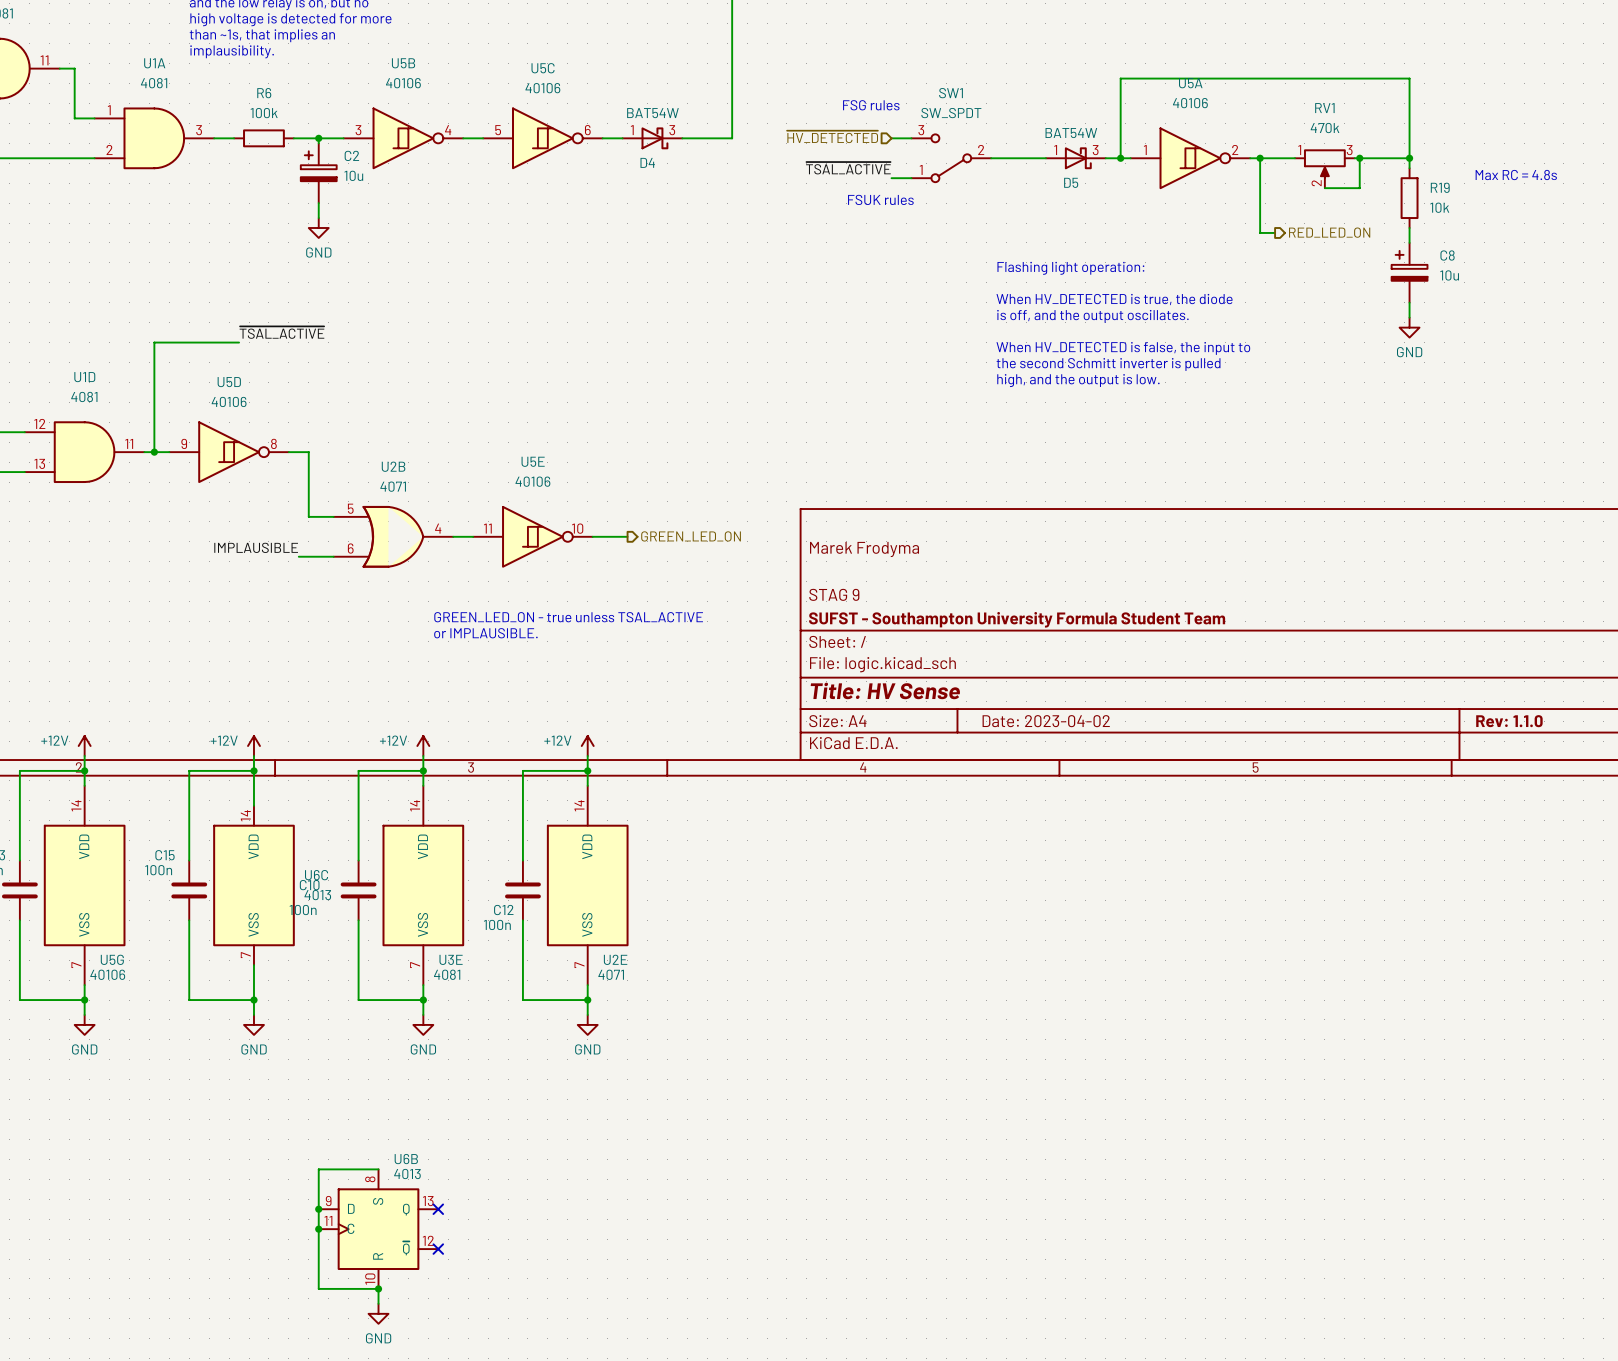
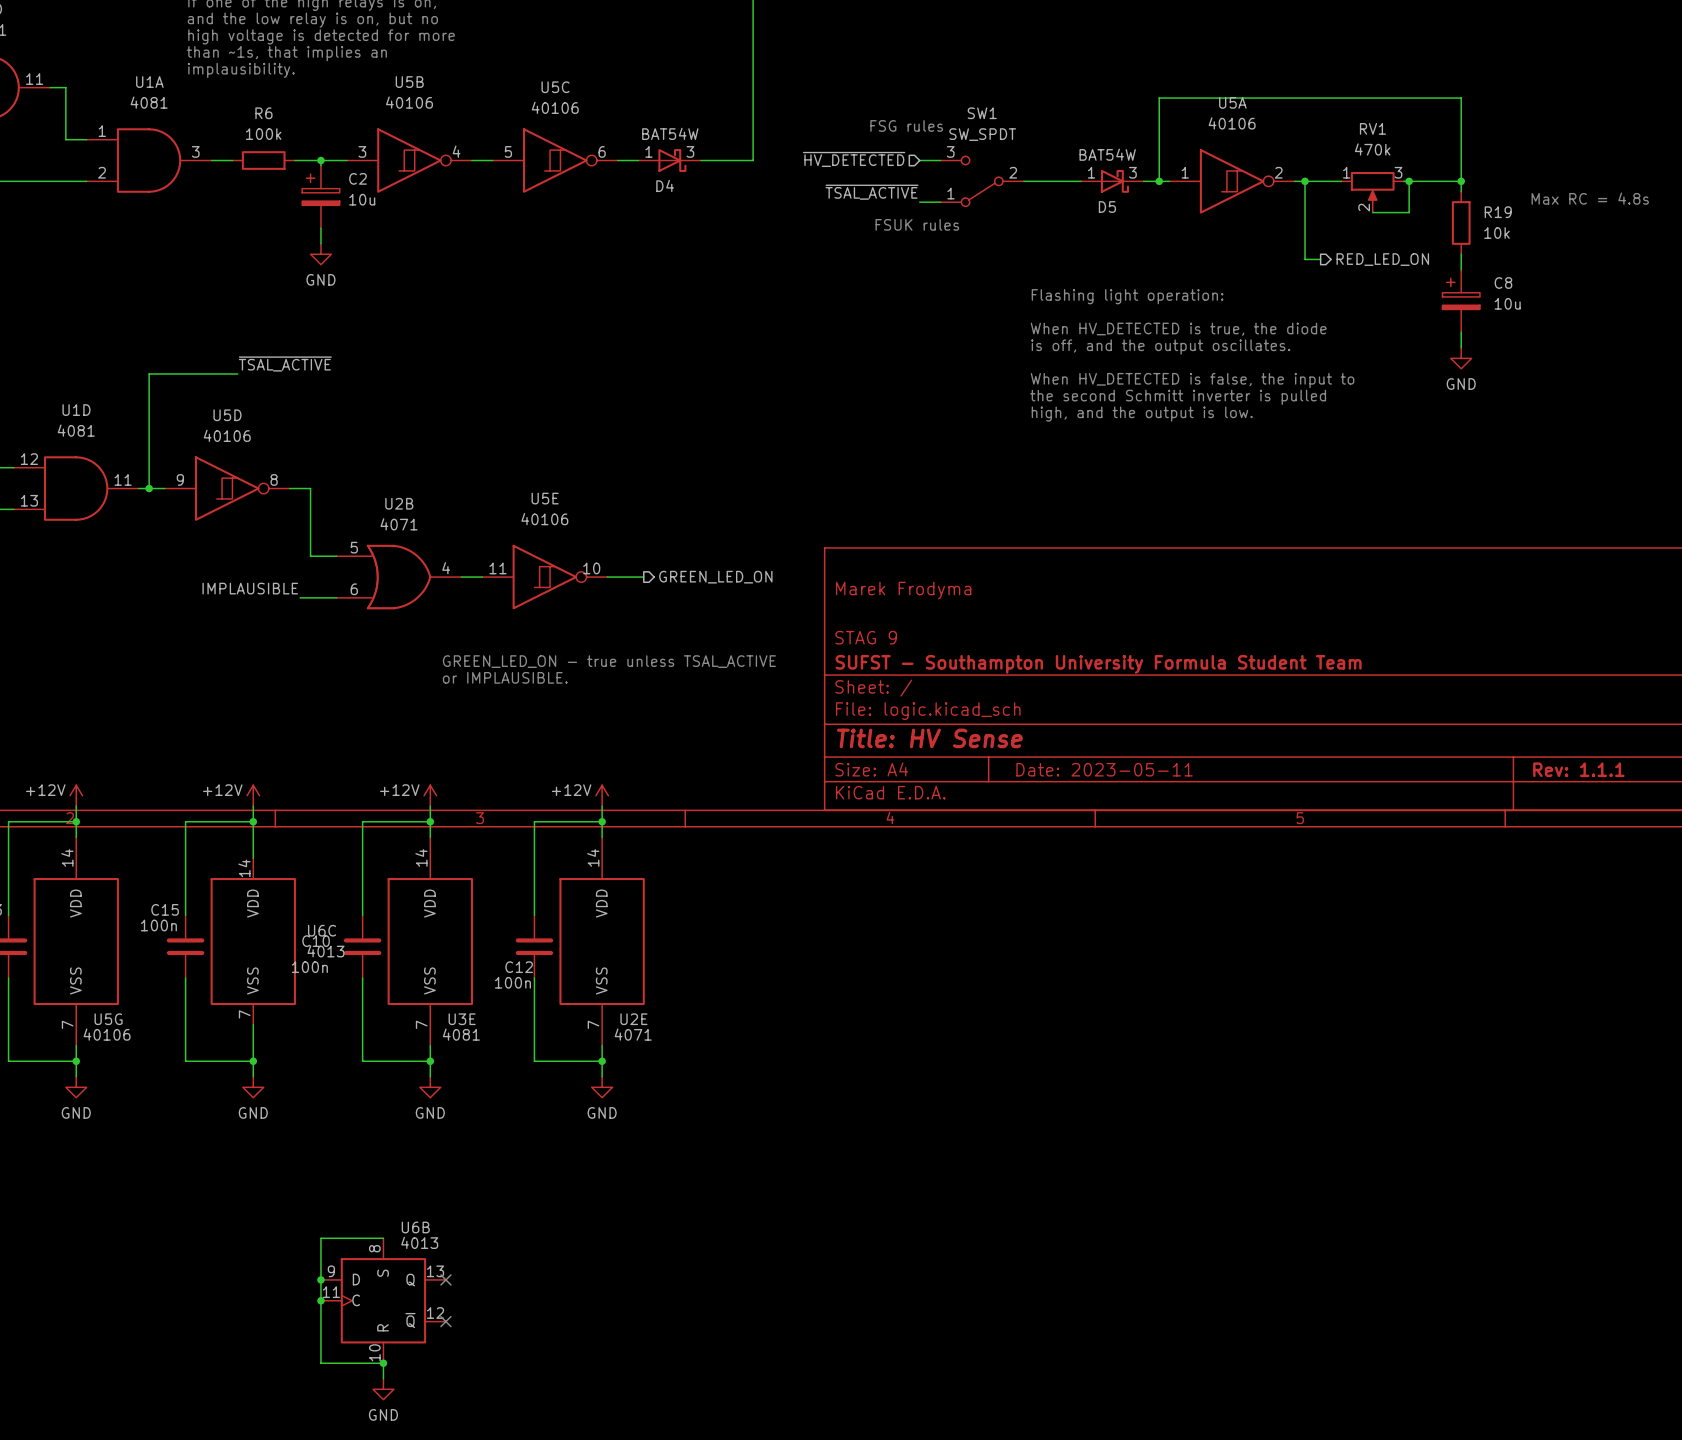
title block: Date: 2023-04-02 (1046, 721) -> Date: 2023-05-11 (1104, 769)
title block: Rev: 1.1.0 (1509, 721) -> Rev: 1.1.1 (1578, 769)

